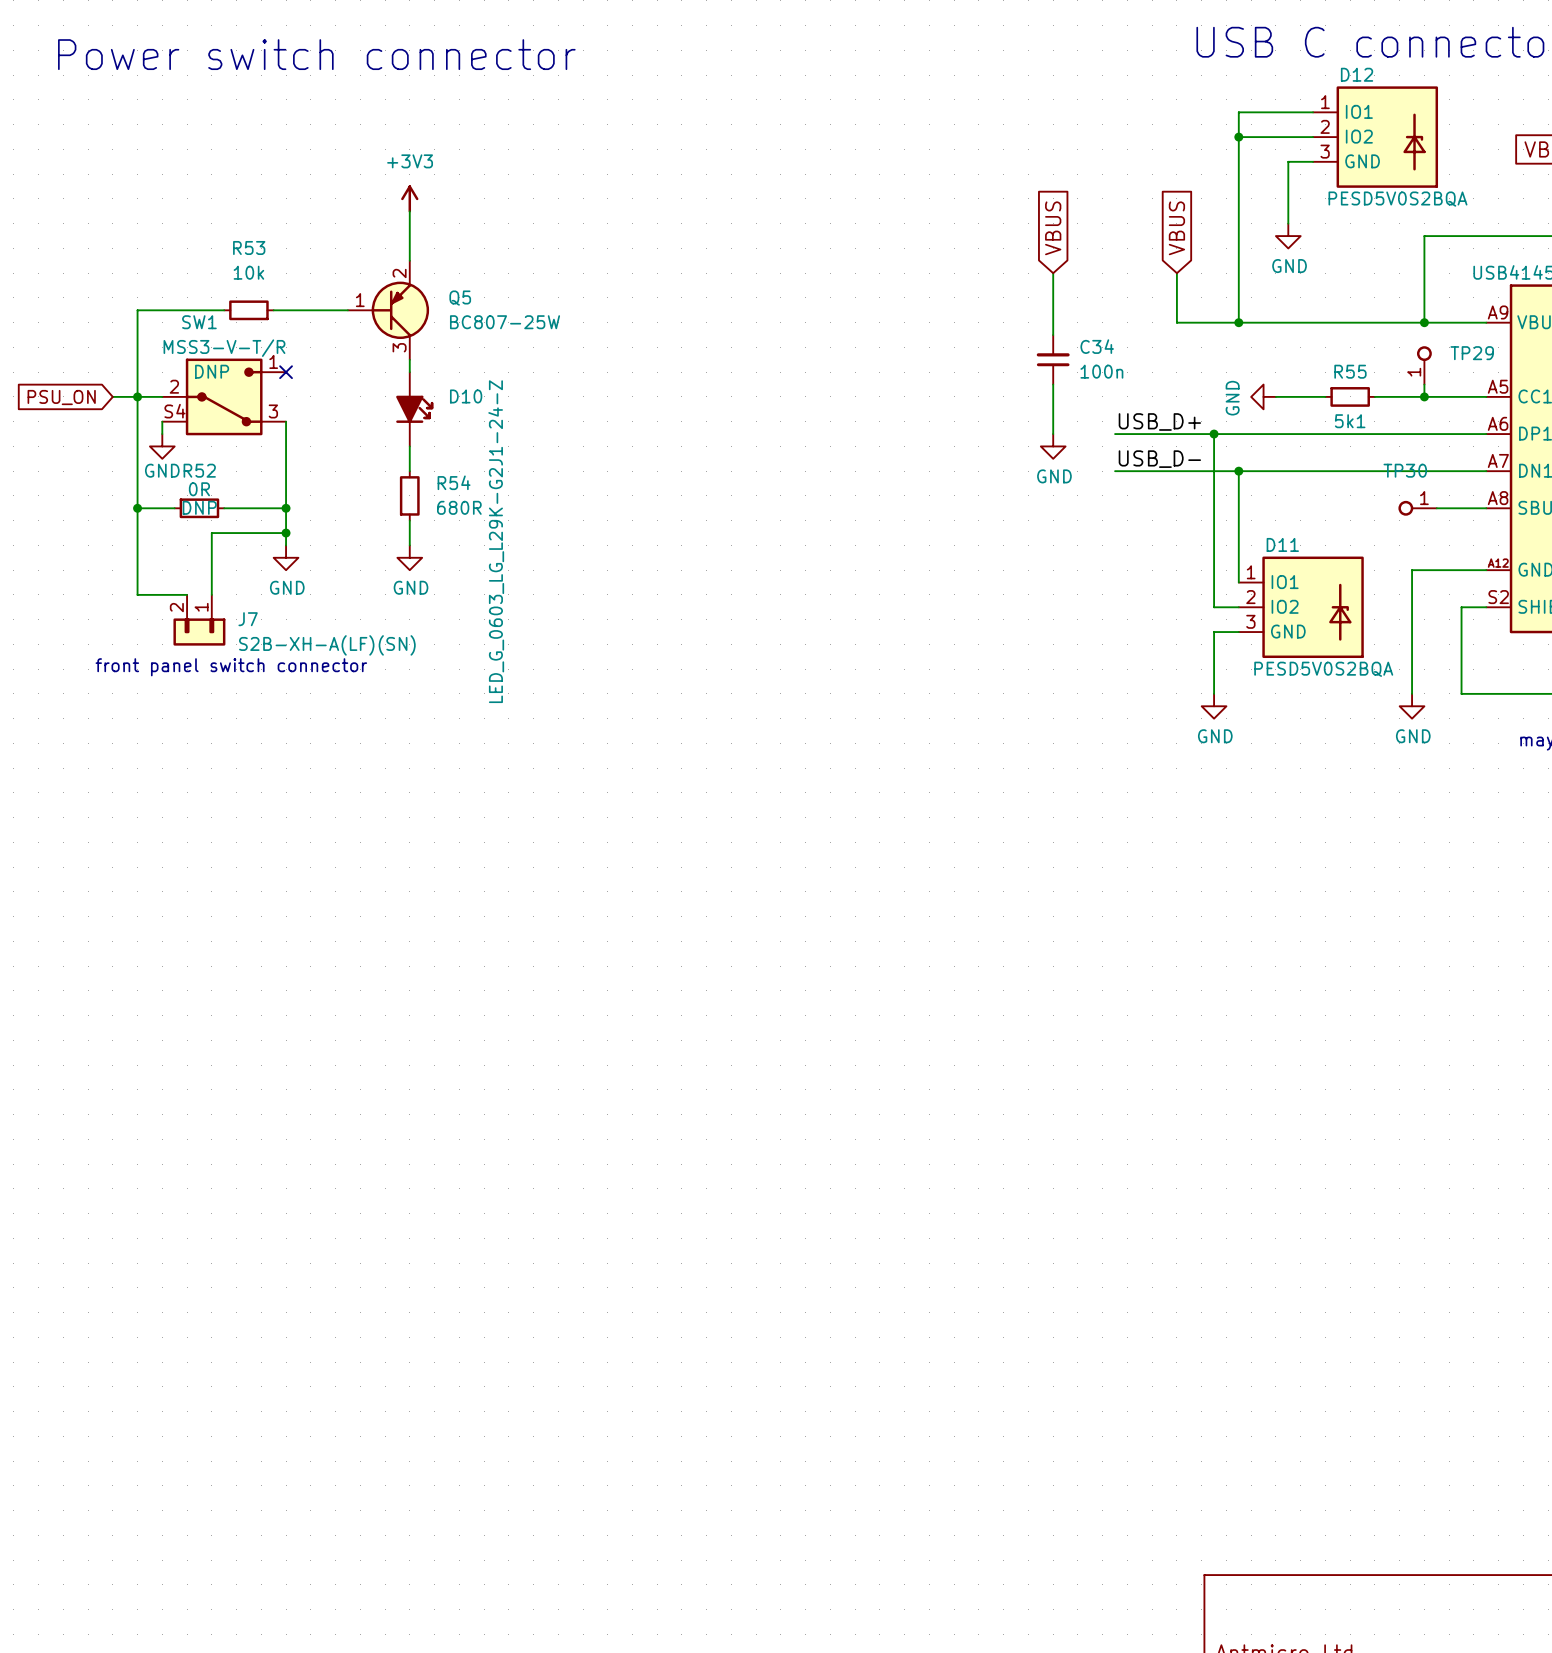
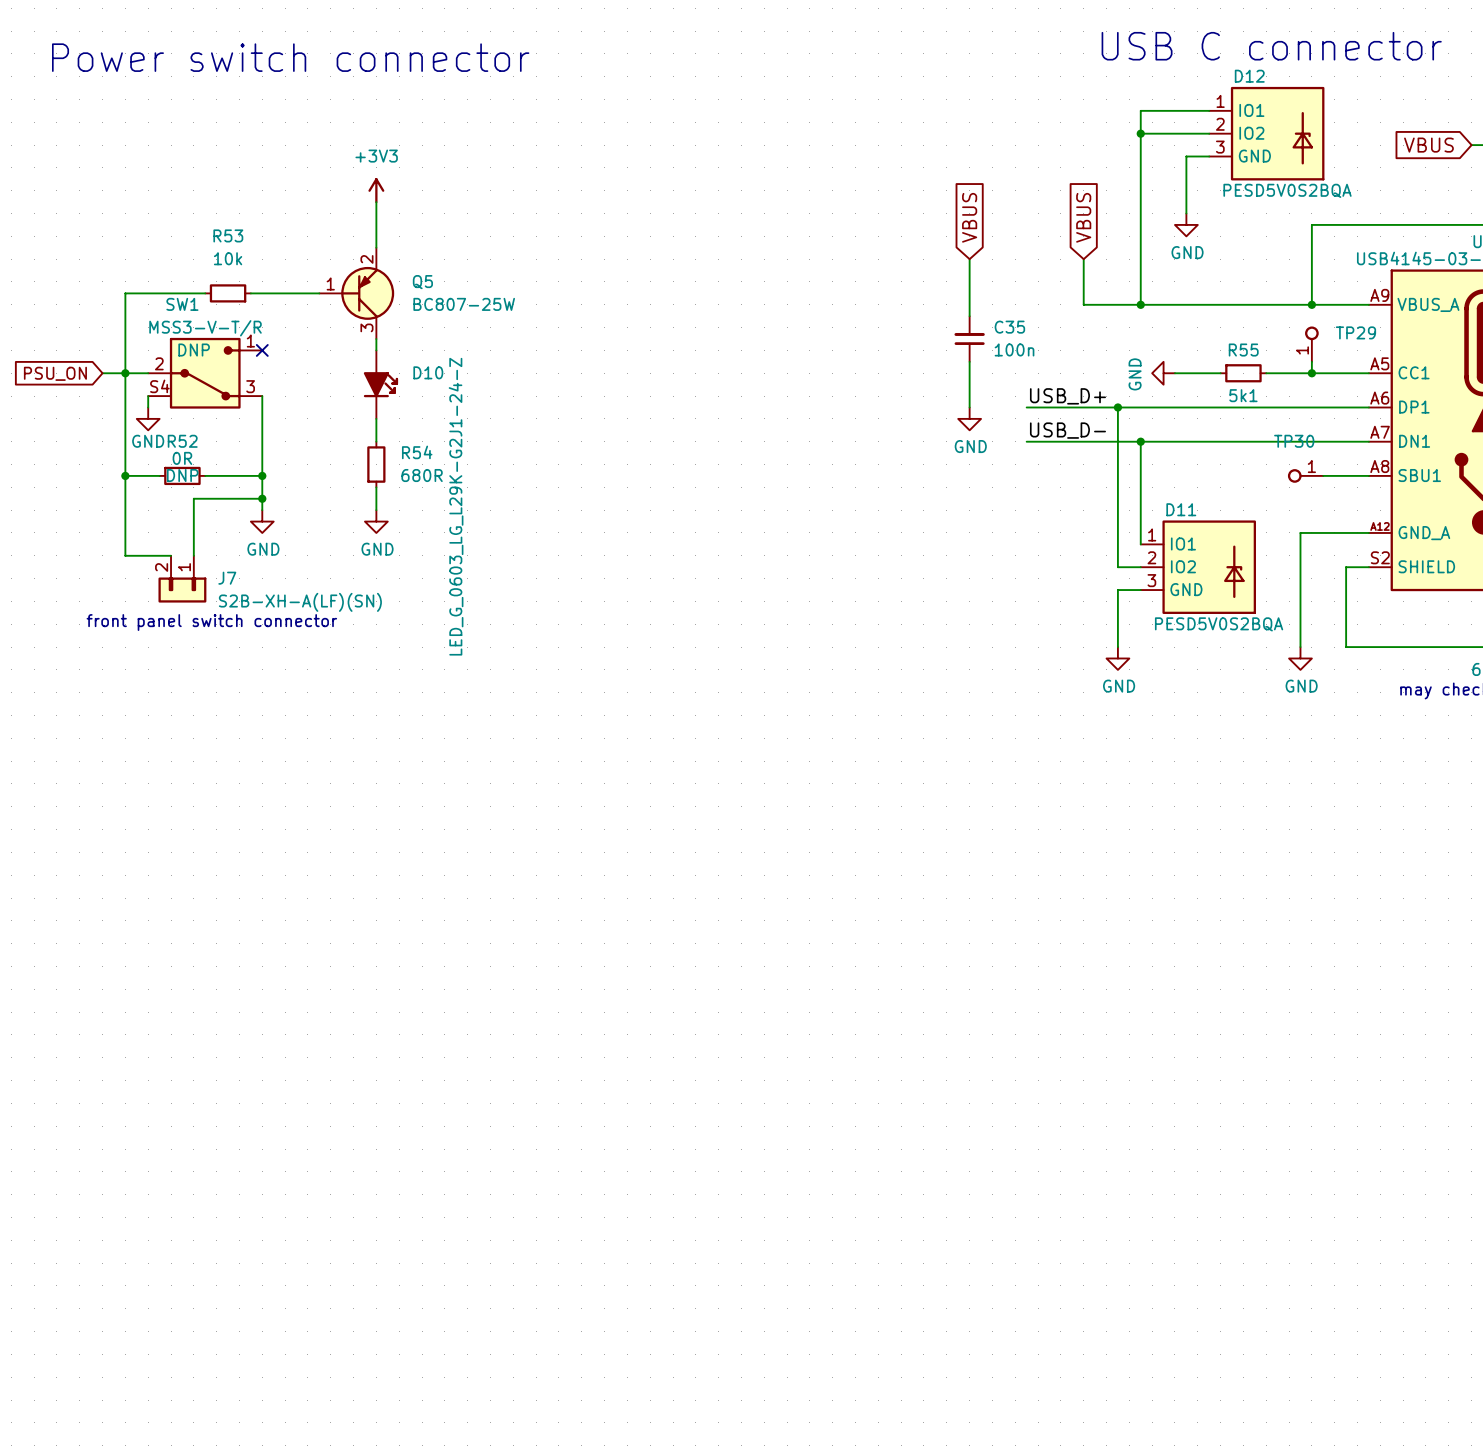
C34 name: C34 (1097, 346) -> C35 (1009, 327)

